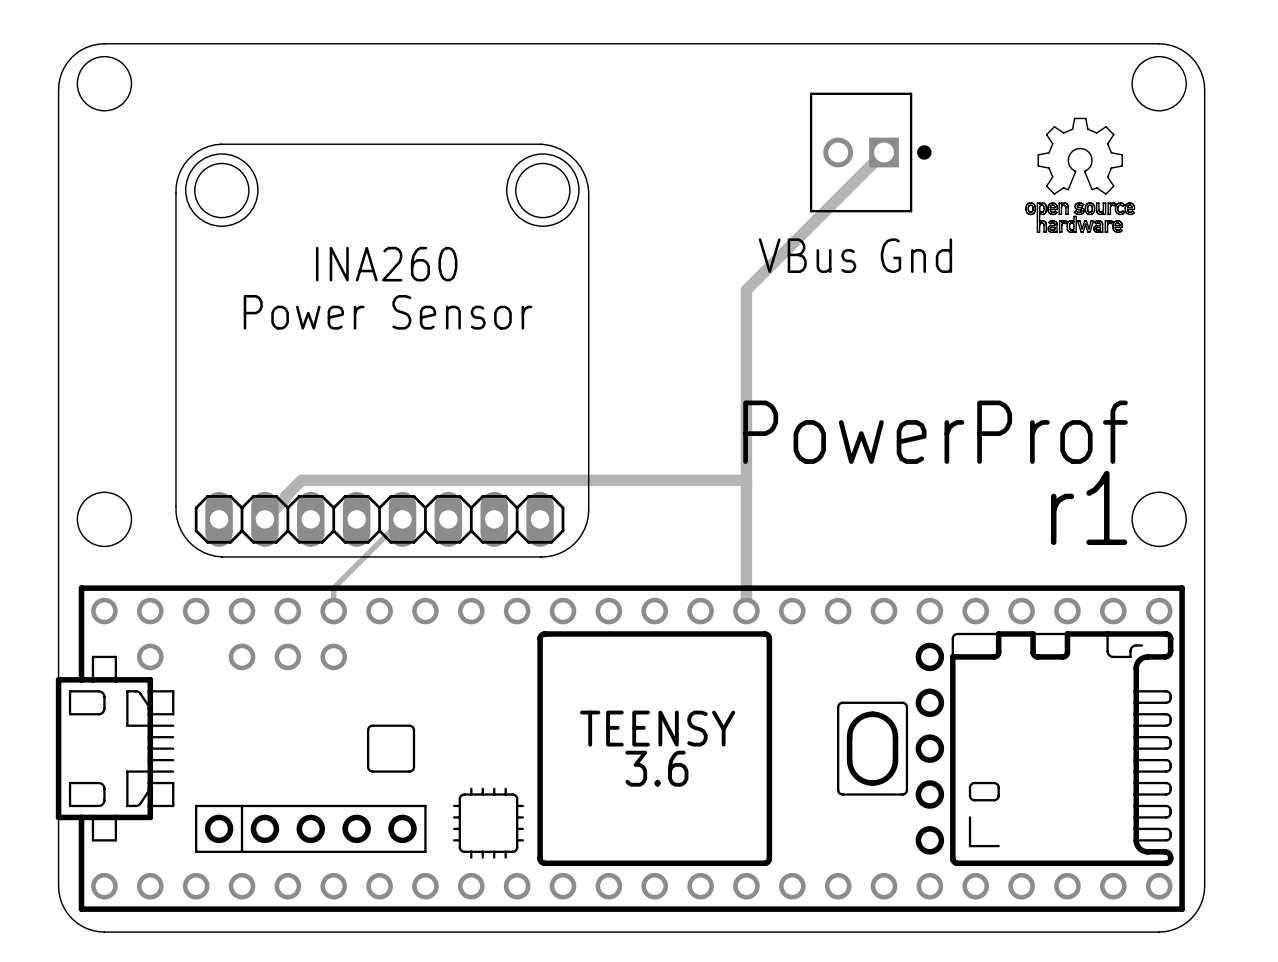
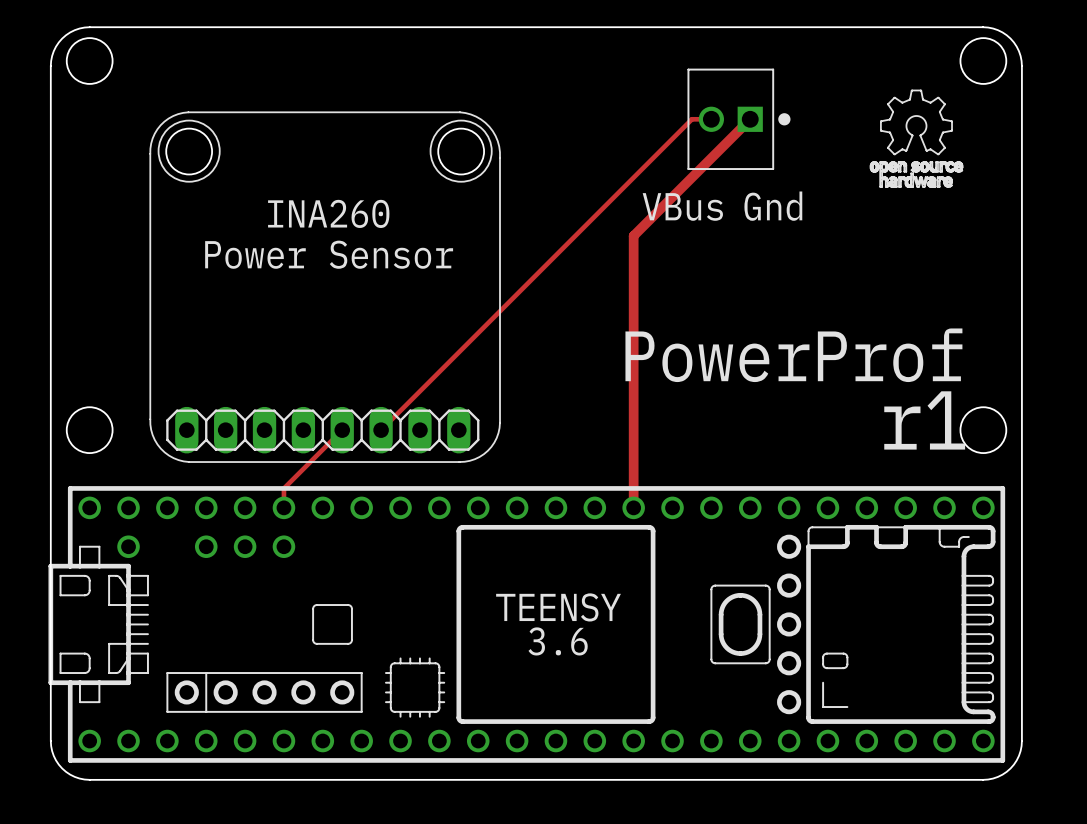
track: none -> (711, 119) (691, 119) (381, 430)
track: (746, 480) (301, 480) (264, 519) -> none

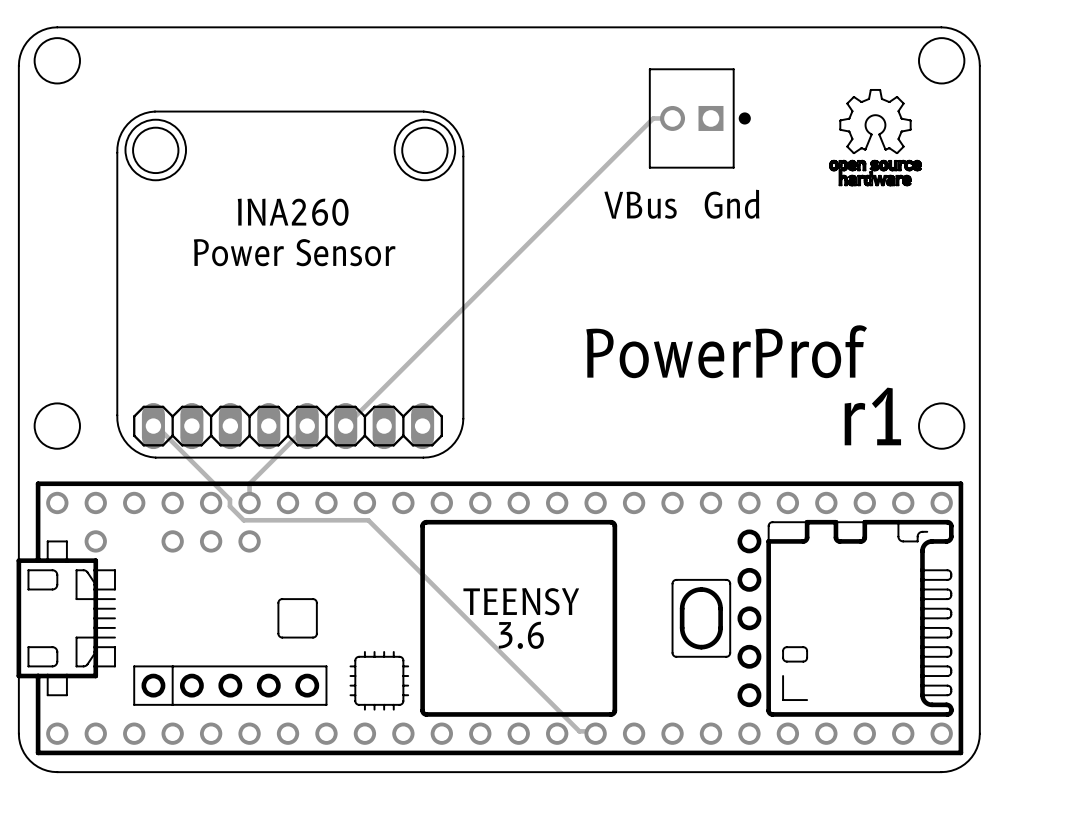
track: (750, 119) (633, 235) (633, 507) -> none
track: none -> (153, 426) (153, 423) (229, 499) (229, 506) (243, 520) (368, 520) (579, 731) (593, 731) (595, 733)

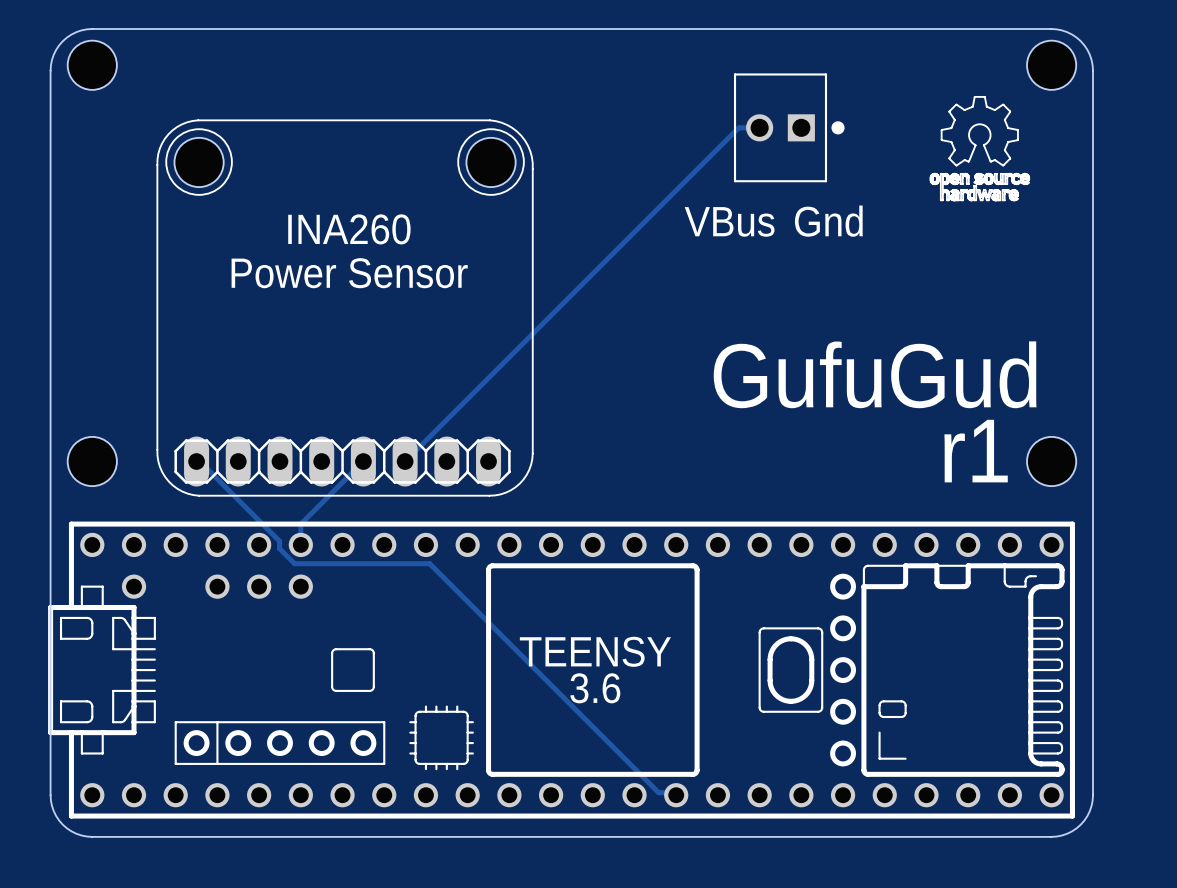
text: none -> GufuGud (875, 374)
text: PowerProf (726, 351) -> none

